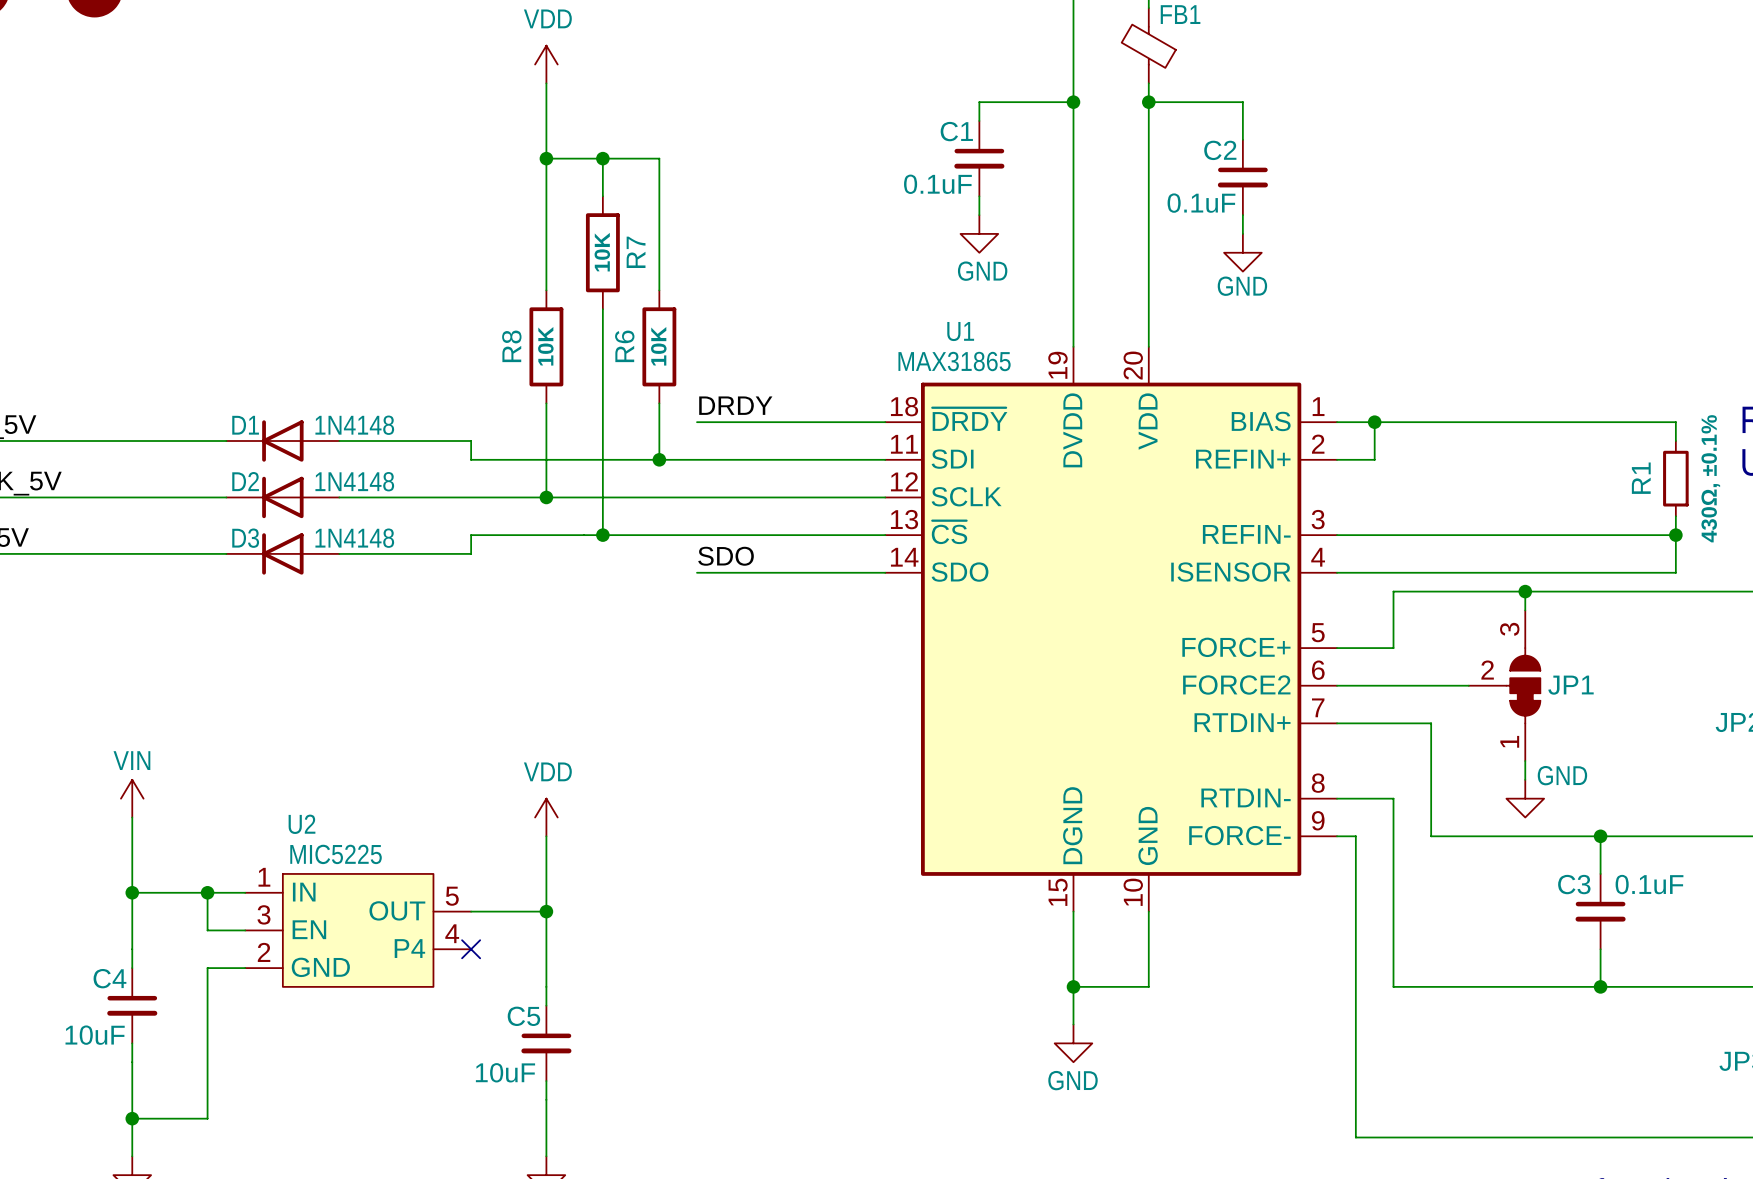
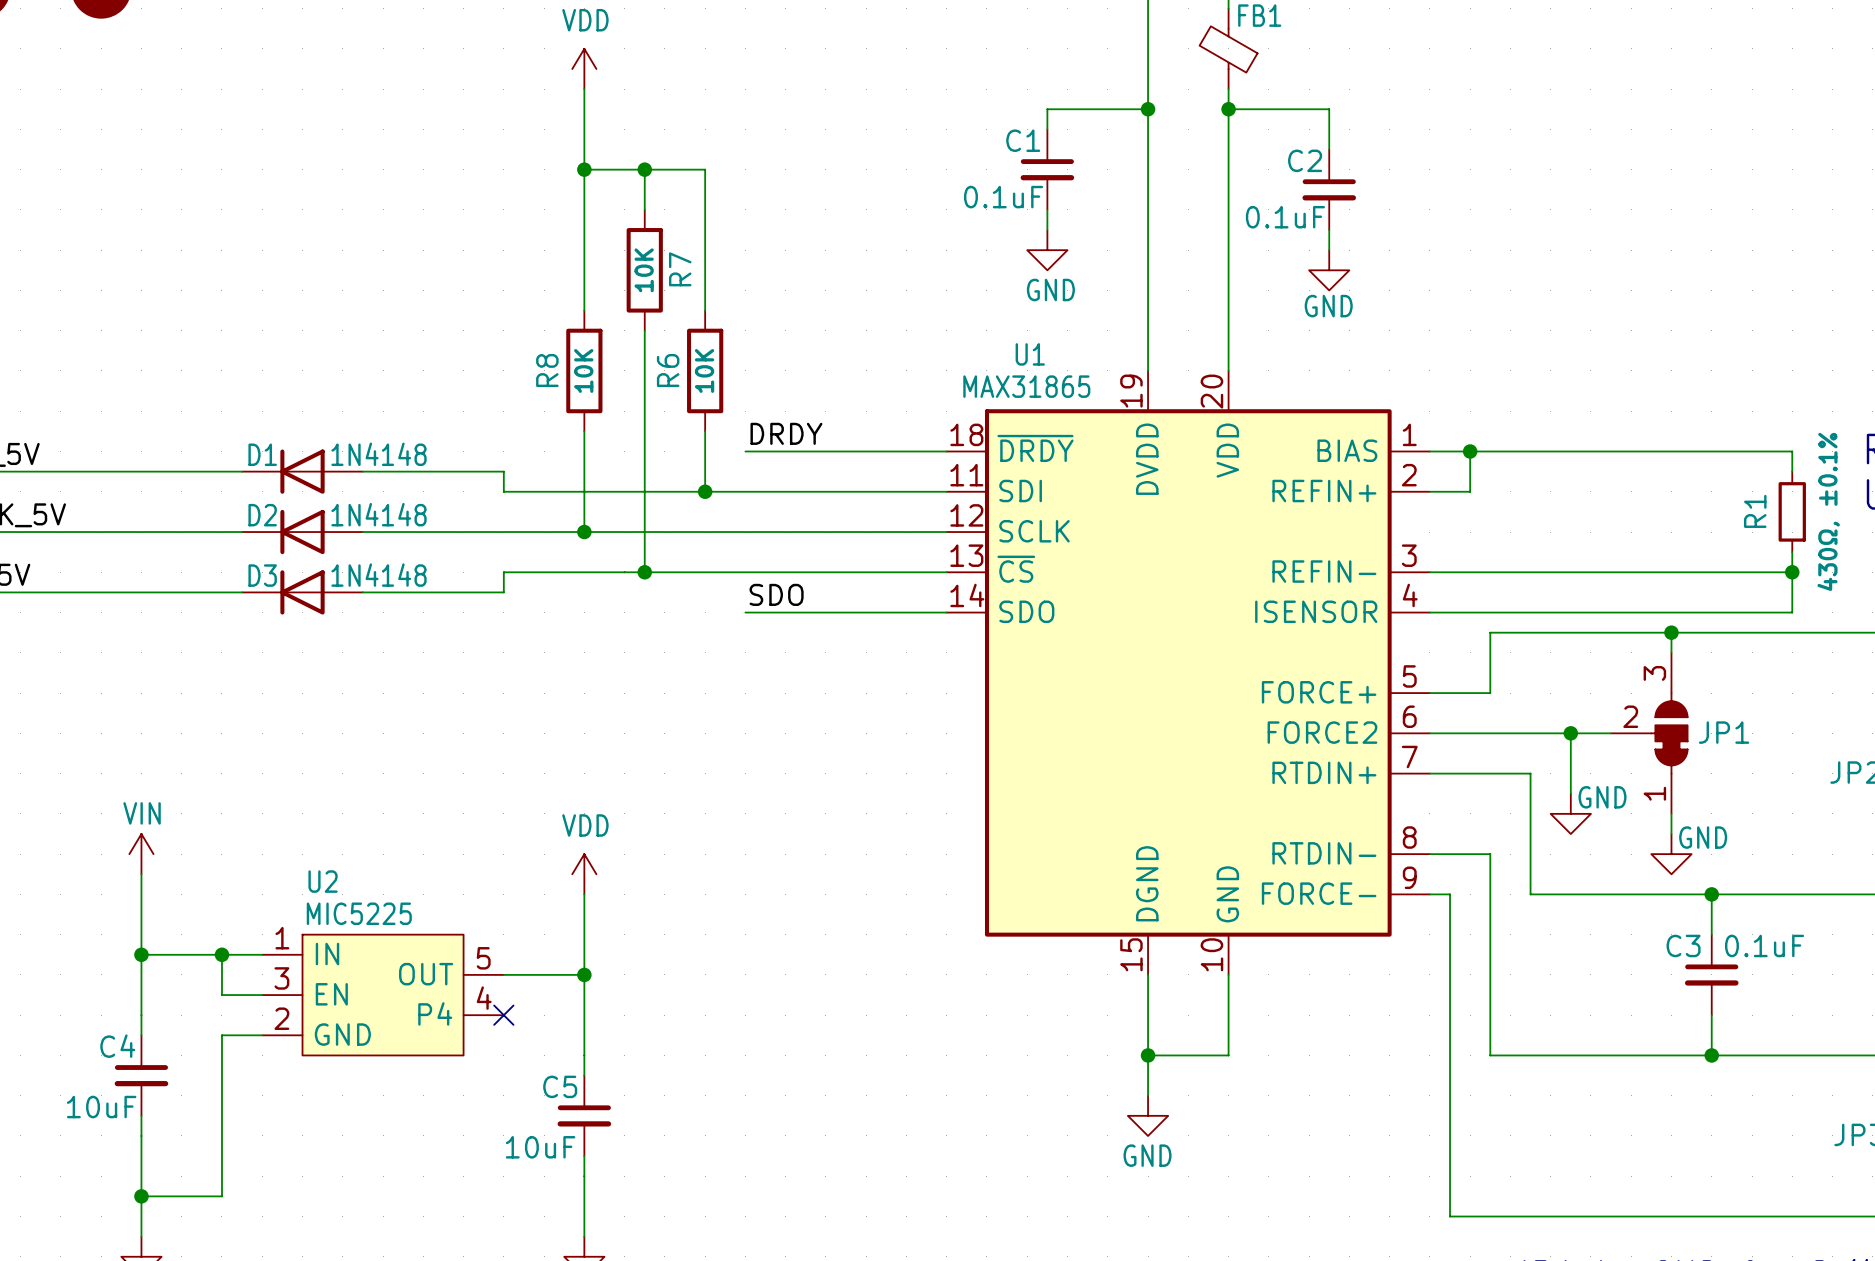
wire: (1525, 591) (1525, 610) -> (1671, 632) (1671, 652)
junction position: (1525, 591) -> (1671, 632)
junction: none -> (1570, 733)
JP1 position: (1504, 685) -> (1649, 733)
wire: none -> (1611, 733) (1570, 733) (1570, 793)
power symbol: none -> GND (1570, 813)
wire: (1525, 761) (1525, 779) -> (1671, 813) (1671, 834)
power symbol: GND (1525, 798) -> none
power symbol: none -> GND (1671, 854)

